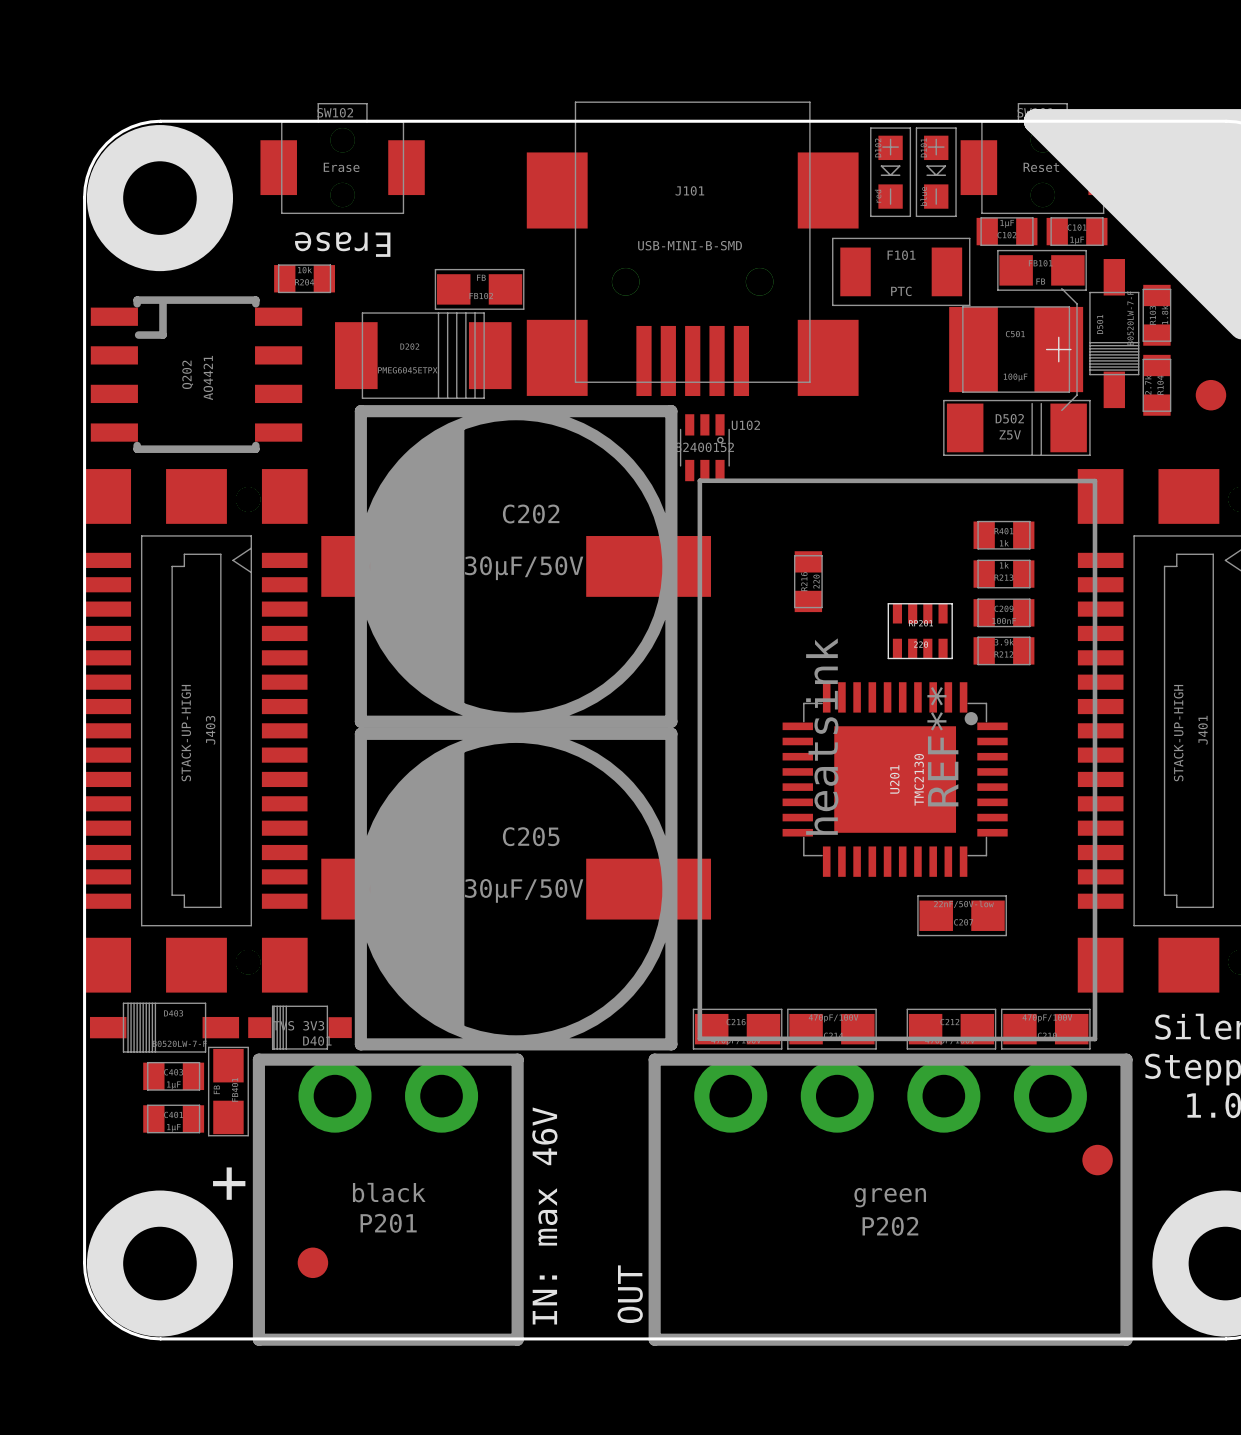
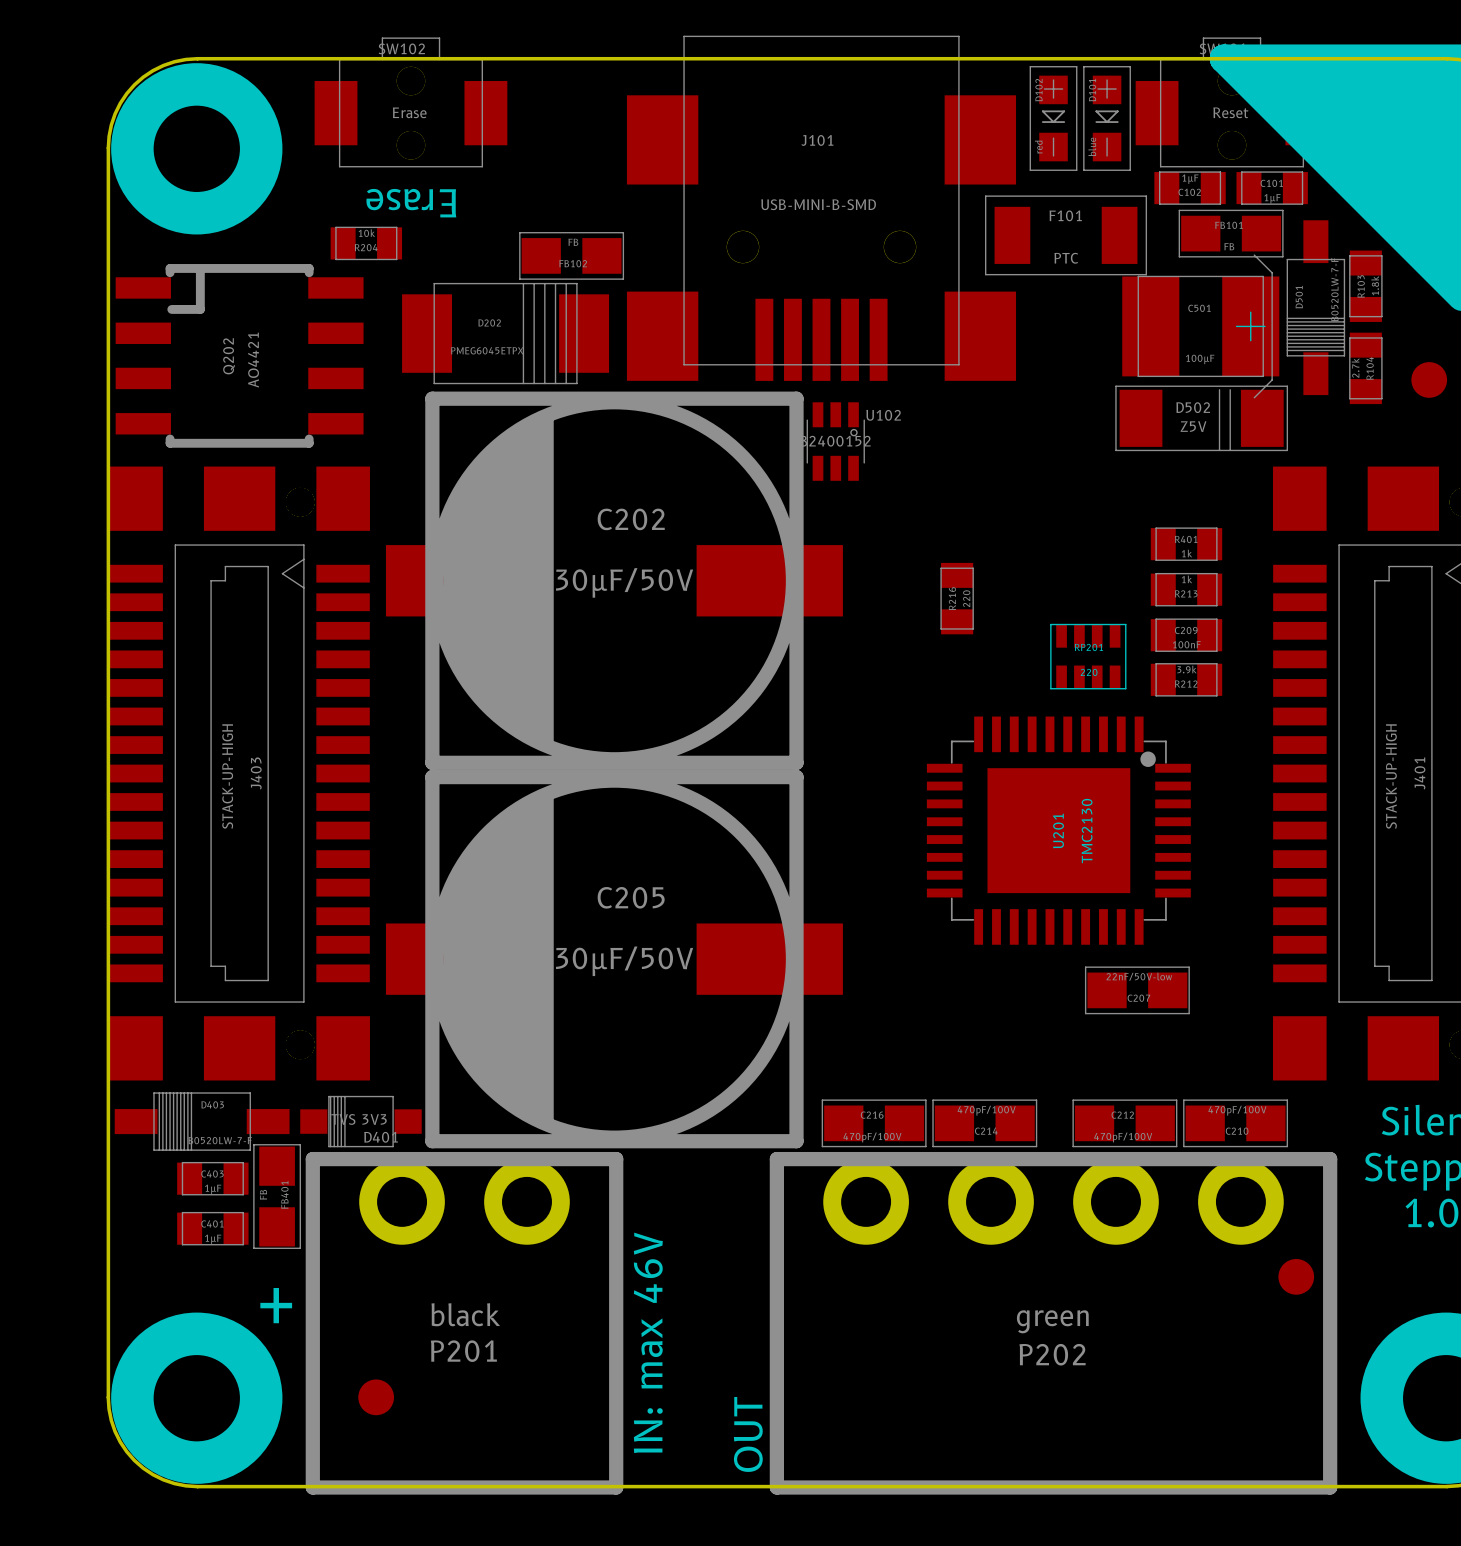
REF**: heatsink (897, 759) -> none

